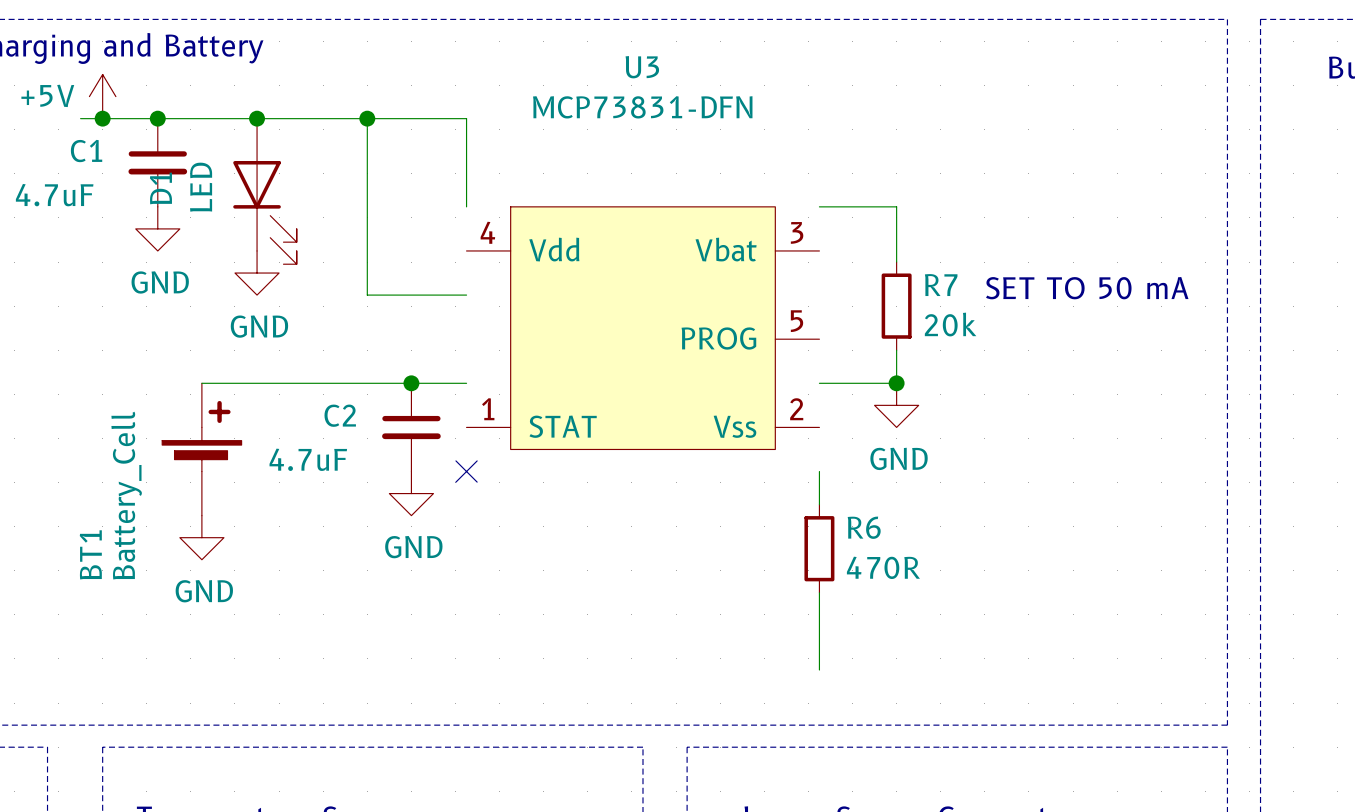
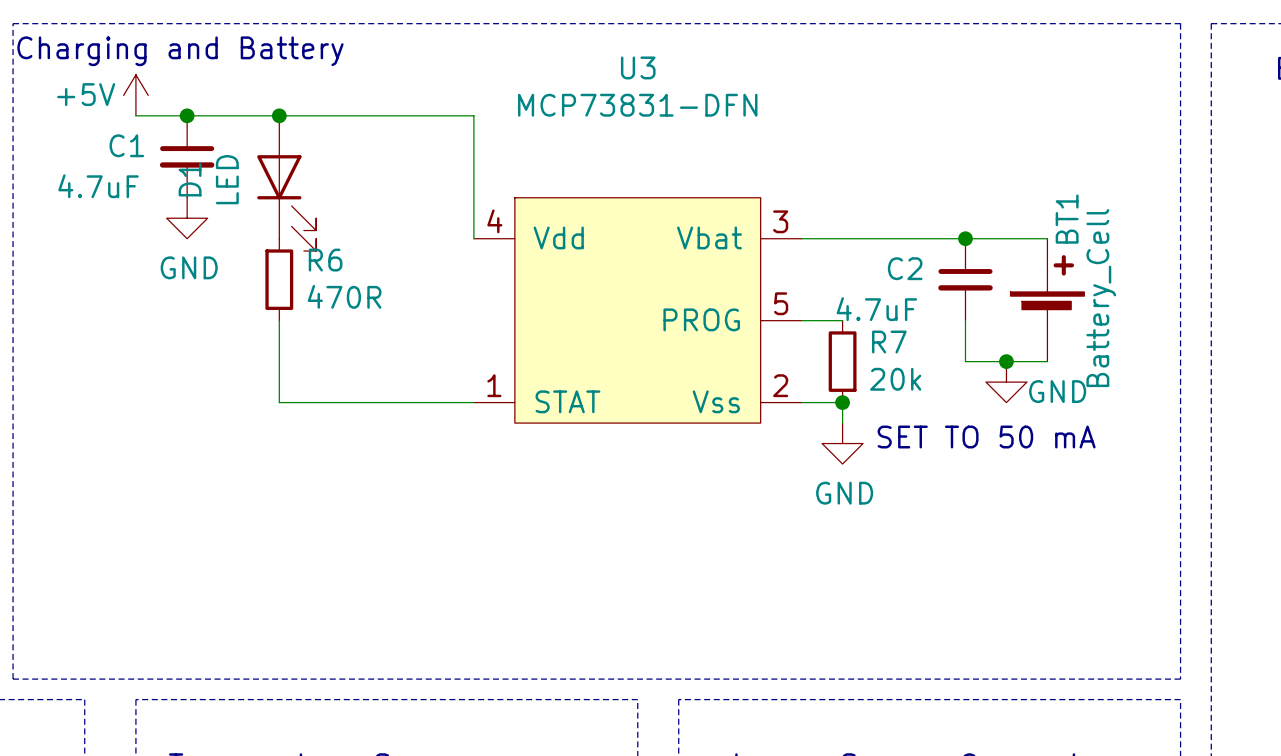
wire: (80, 118) (102, 118) -> none
junction: (102, 118) -> none
wire: (367, 118) (367, 295) (466, 295) -> none
junction: (367, 118) -> none
wire: none -> (473, 197) (473, 238)
wire: (819, 206) (896, 206) (896, 262) -> none
wire: none -> (801, 238) (1047, 238)
junction: none -> (965, 238)
power symbol: GND (257, 273) -> none
text position: SET TO 50 mA (1087, 288) -> SET TO 50 mA (986, 437)
R7 position: (896, 306) -> (842, 361)
wire: none -> (279, 320) (279, 402) (473, 402)
wire: none -> (801, 320) (842, 320)
wire: none -> (965, 320) (965, 361) (1047, 361)
wire: (896, 350) (896, 383) (819, 383) -> none
wire: (201, 383) (466, 383) -> none
junction: (411, 383) -> none
junction position: (896, 383) -> (842, 402)
junction: none -> (1006, 361)
power symbol: GND (896, 405) -> none
power symbol: none -> GND (1006, 382)
C2 position: (411, 427) -> (965, 279)
wire: none -> (801, 402) (842, 402) (842, 423)
BT1 position: (201, 449) -> (1047, 300)
no-connect mark: (466, 471) -> none
wire: (819, 471) (819, 504) -> none
power symbol: none -> GND (842, 443)
power symbol: GND (411, 493) -> none
BT1 value position: Battery_Cell (126, 495) -> Battery_Cell (1101, 298)
power symbol: GND (201, 537) -> none
R6 position: (819, 548) -> (279, 279)
BT1 name position: BT1 (90, 554) -> BT1 (1067, 219)
wire: (819, 592) (819, 670) -> none

